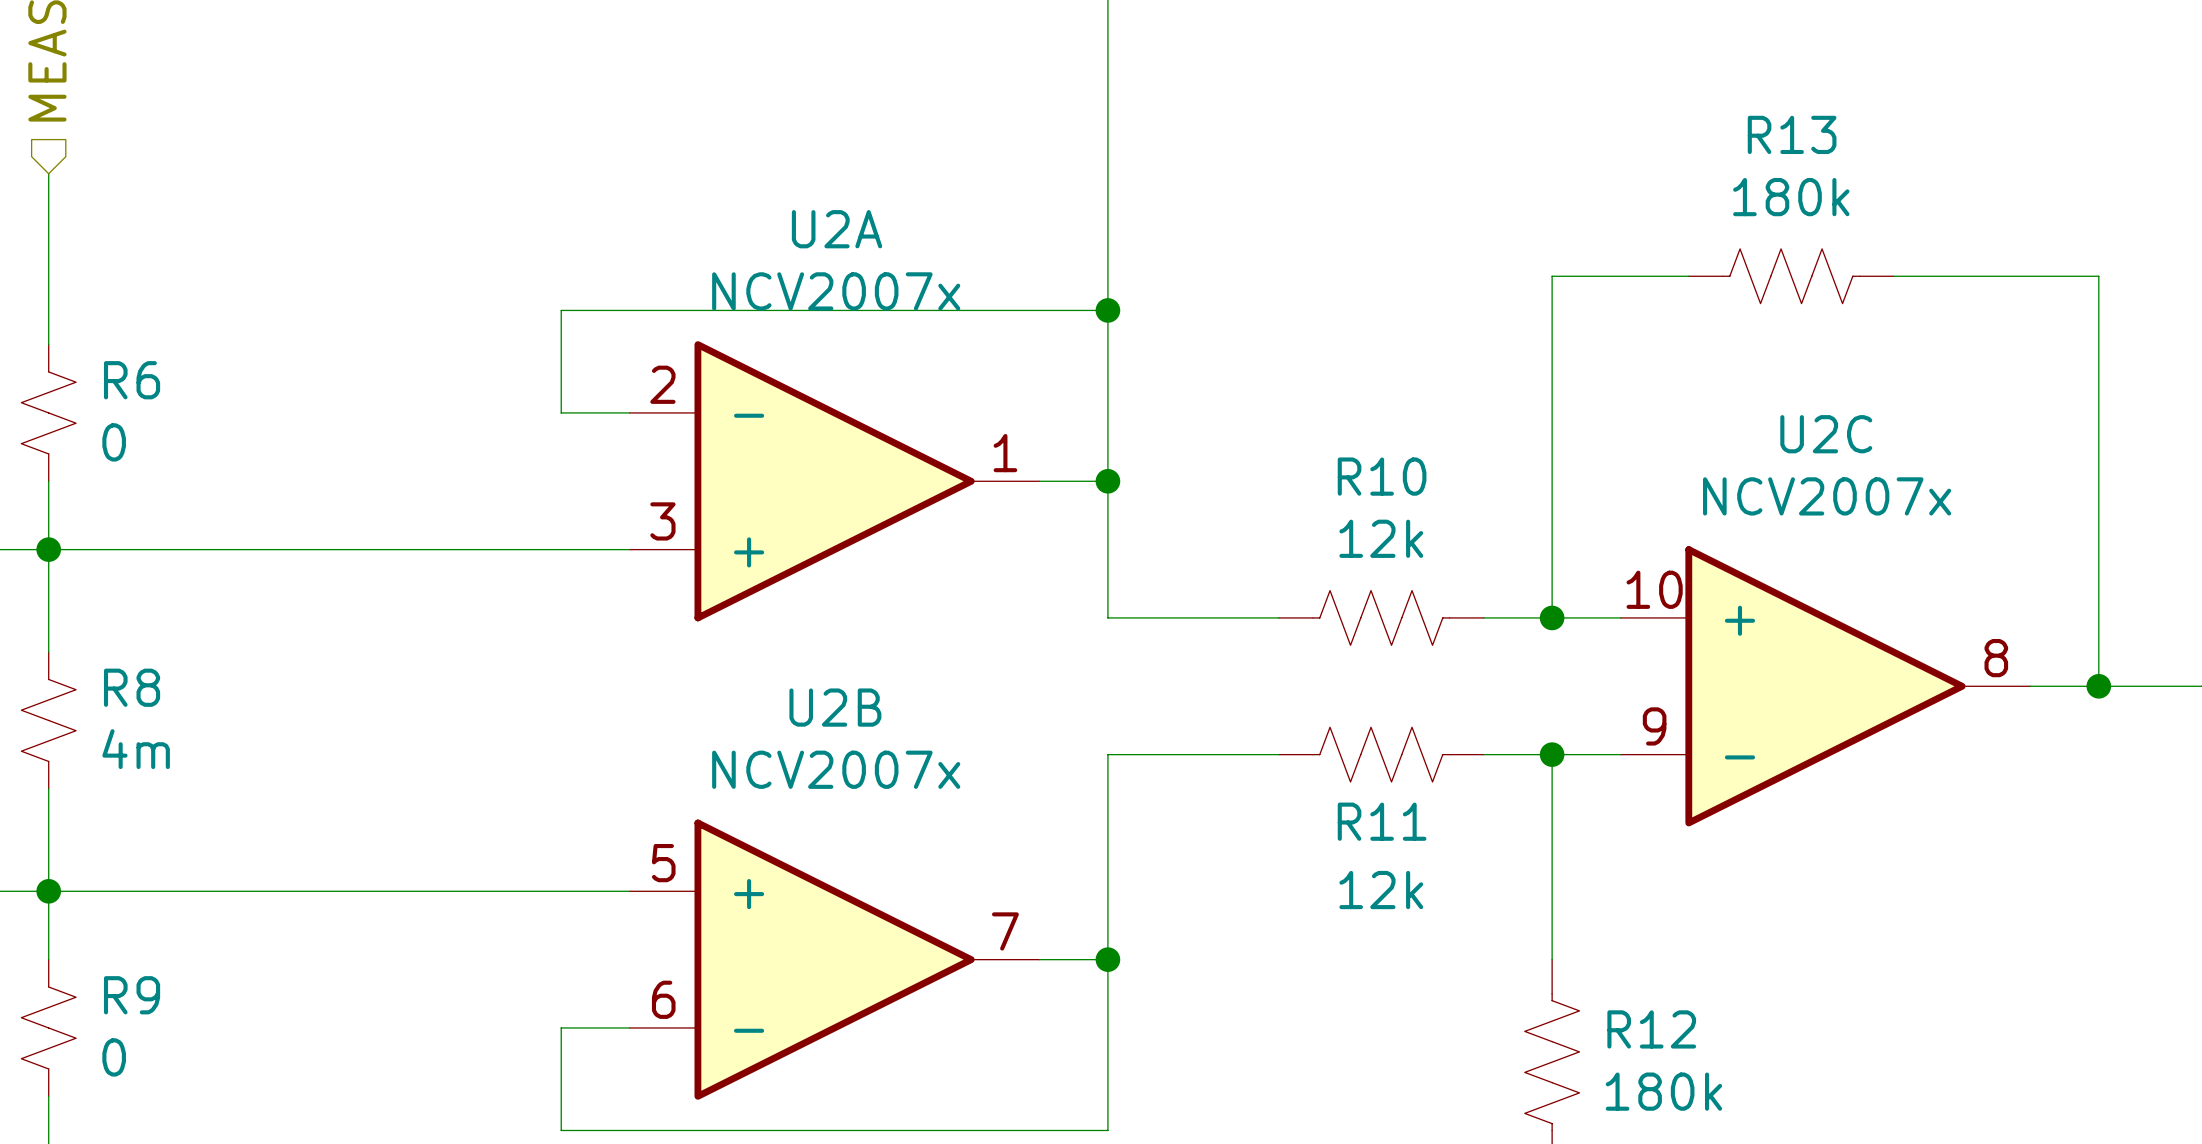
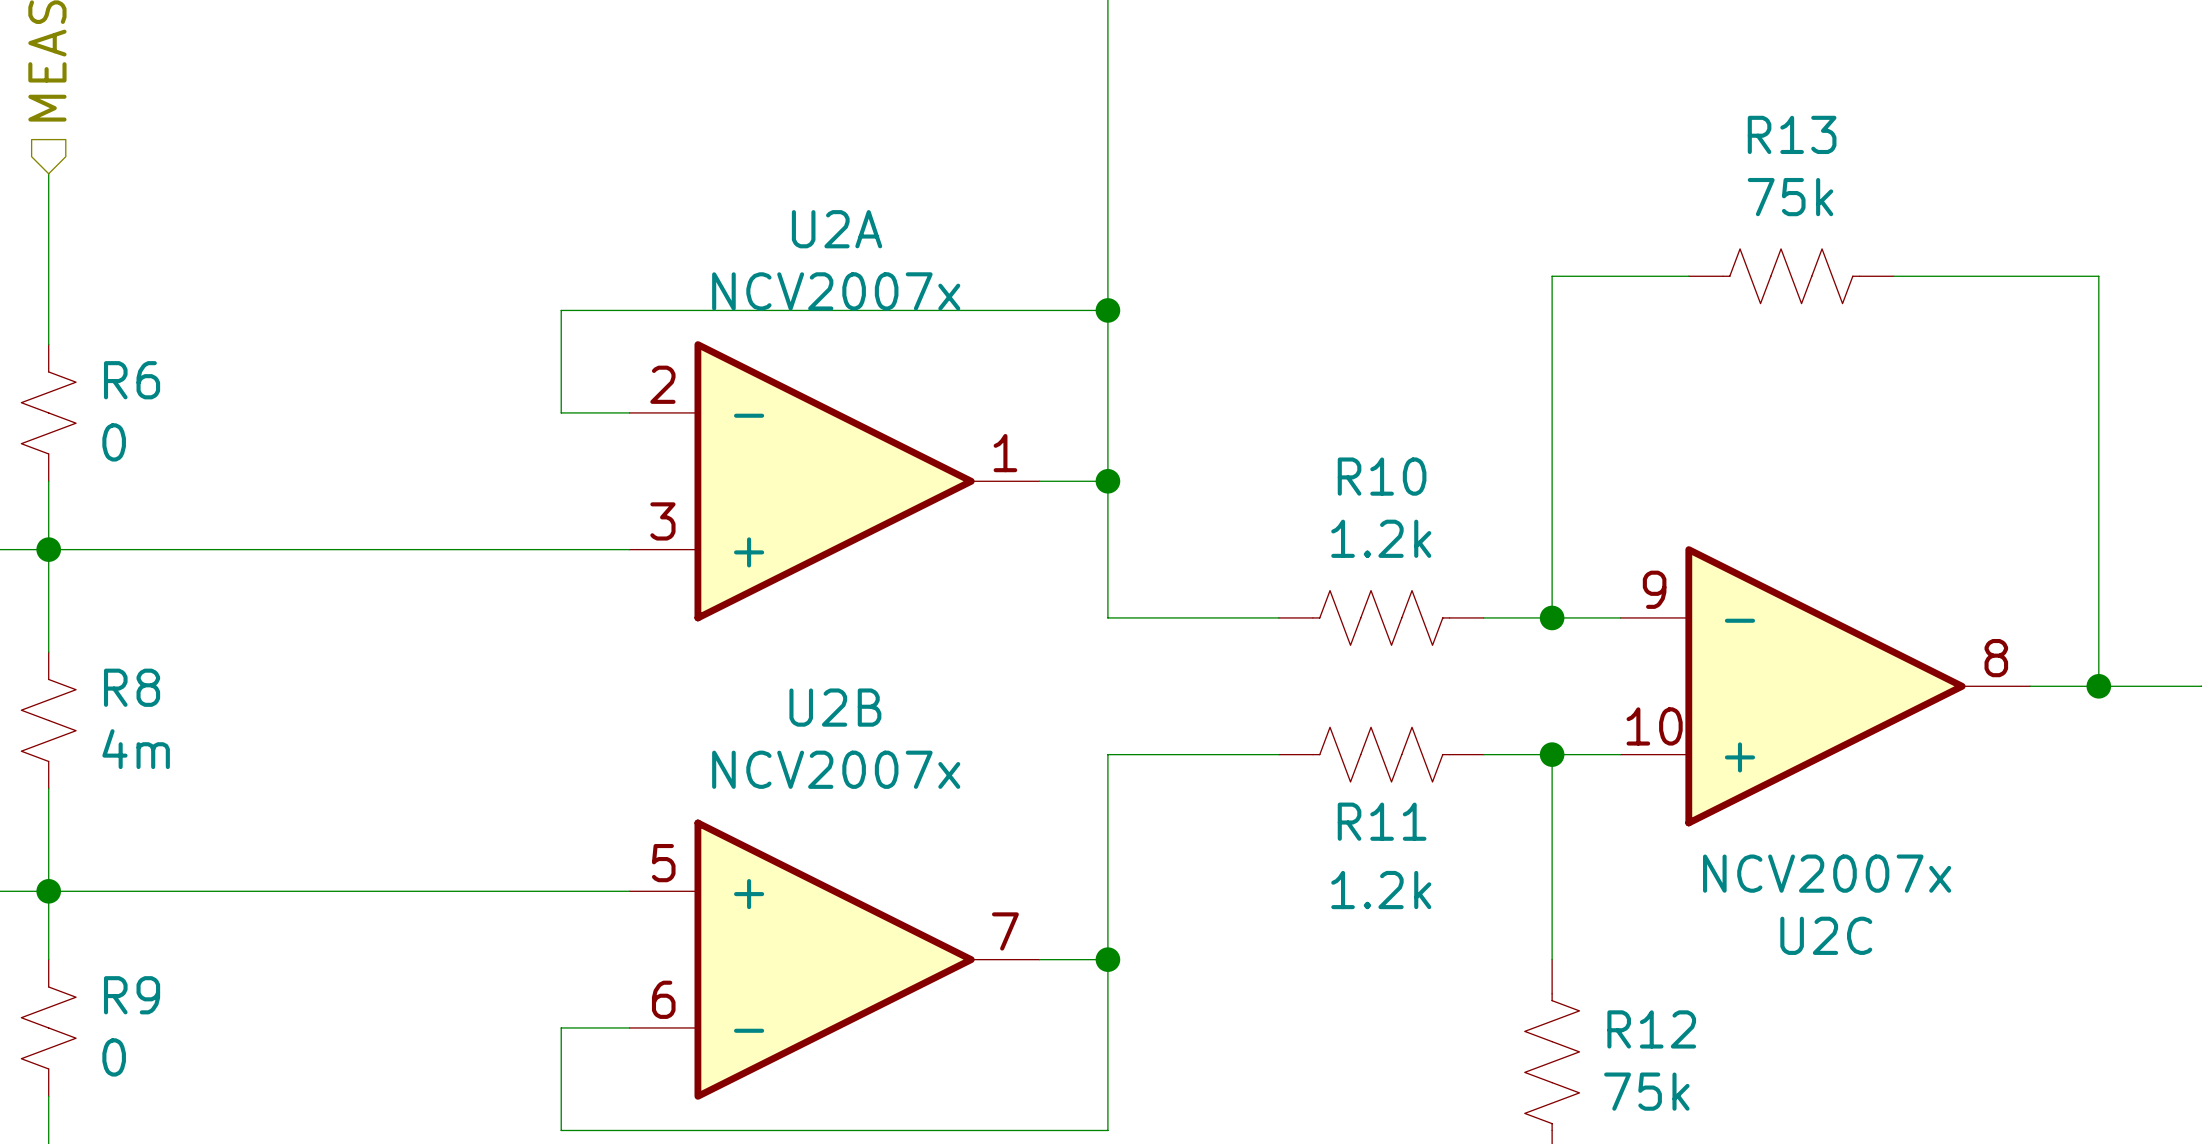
R13 value: 180k (1791, 197) -> 75k (1790, 197)
R10 value: 12k (1381, 538) -> 1.2k (1381, 538)
U2C flip: as is (1825, 686) -> up-down (1825, 686)
R11 value: 12k (1381, 890) -> 1.2k (1381, 890)
R12 value: 180k (1663, 1091) -> 75k (1646, 1091)

